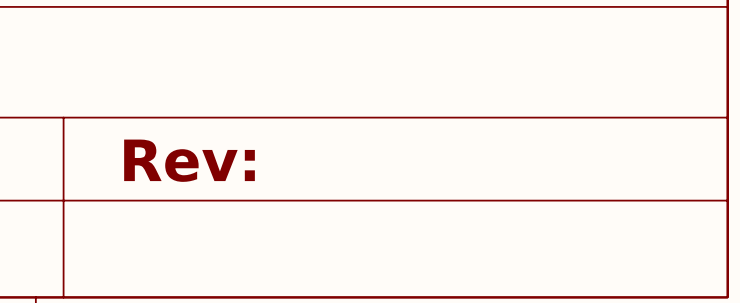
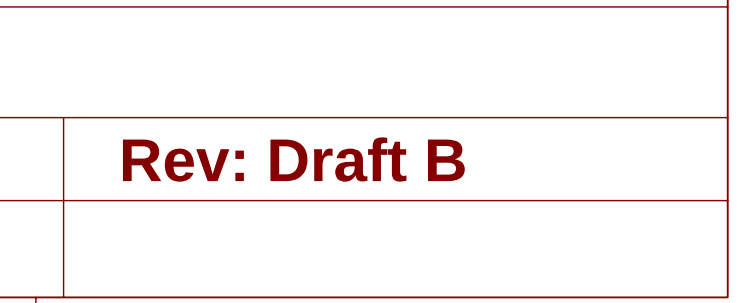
title block: Rev: (189, 160) -> Rev: Draft B (293, 159)

